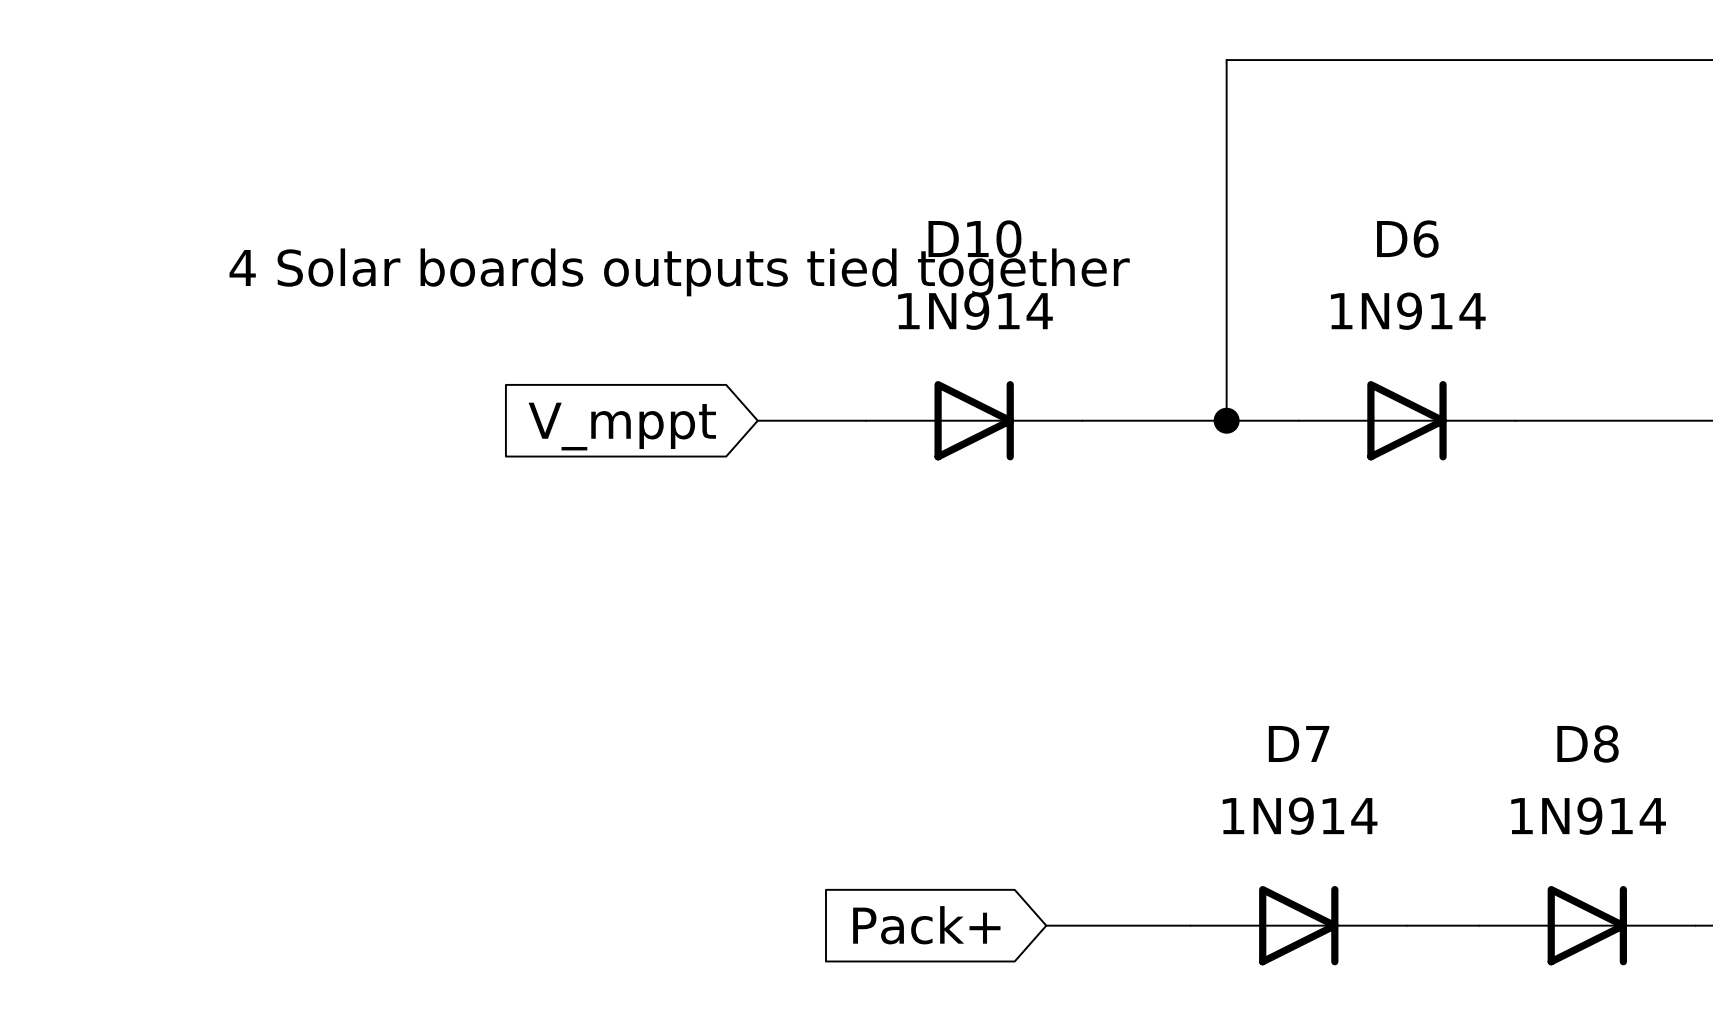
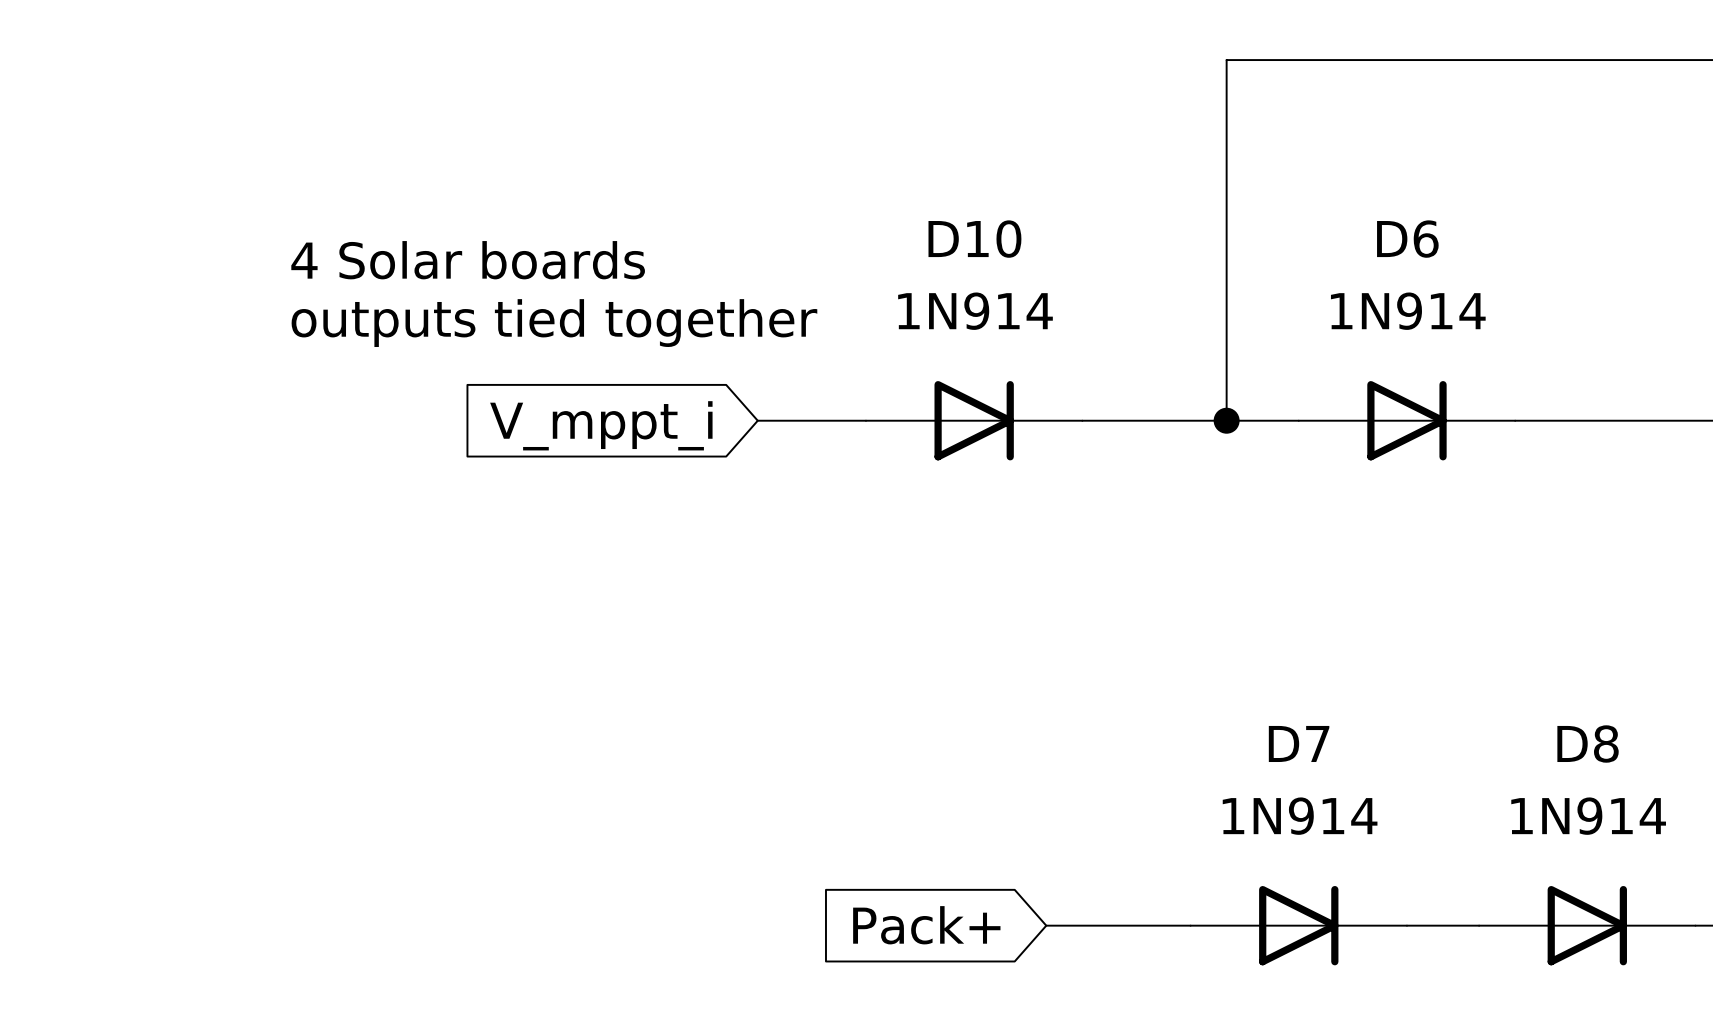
text: none -> 4 Solar boards (468, 260)
text: 4 Solar boards outputs tied together (679, 272) -> outputs tied together (554, 323)
global label: V_mppt (622, 426) -> V_mppt_i (601, 425)

